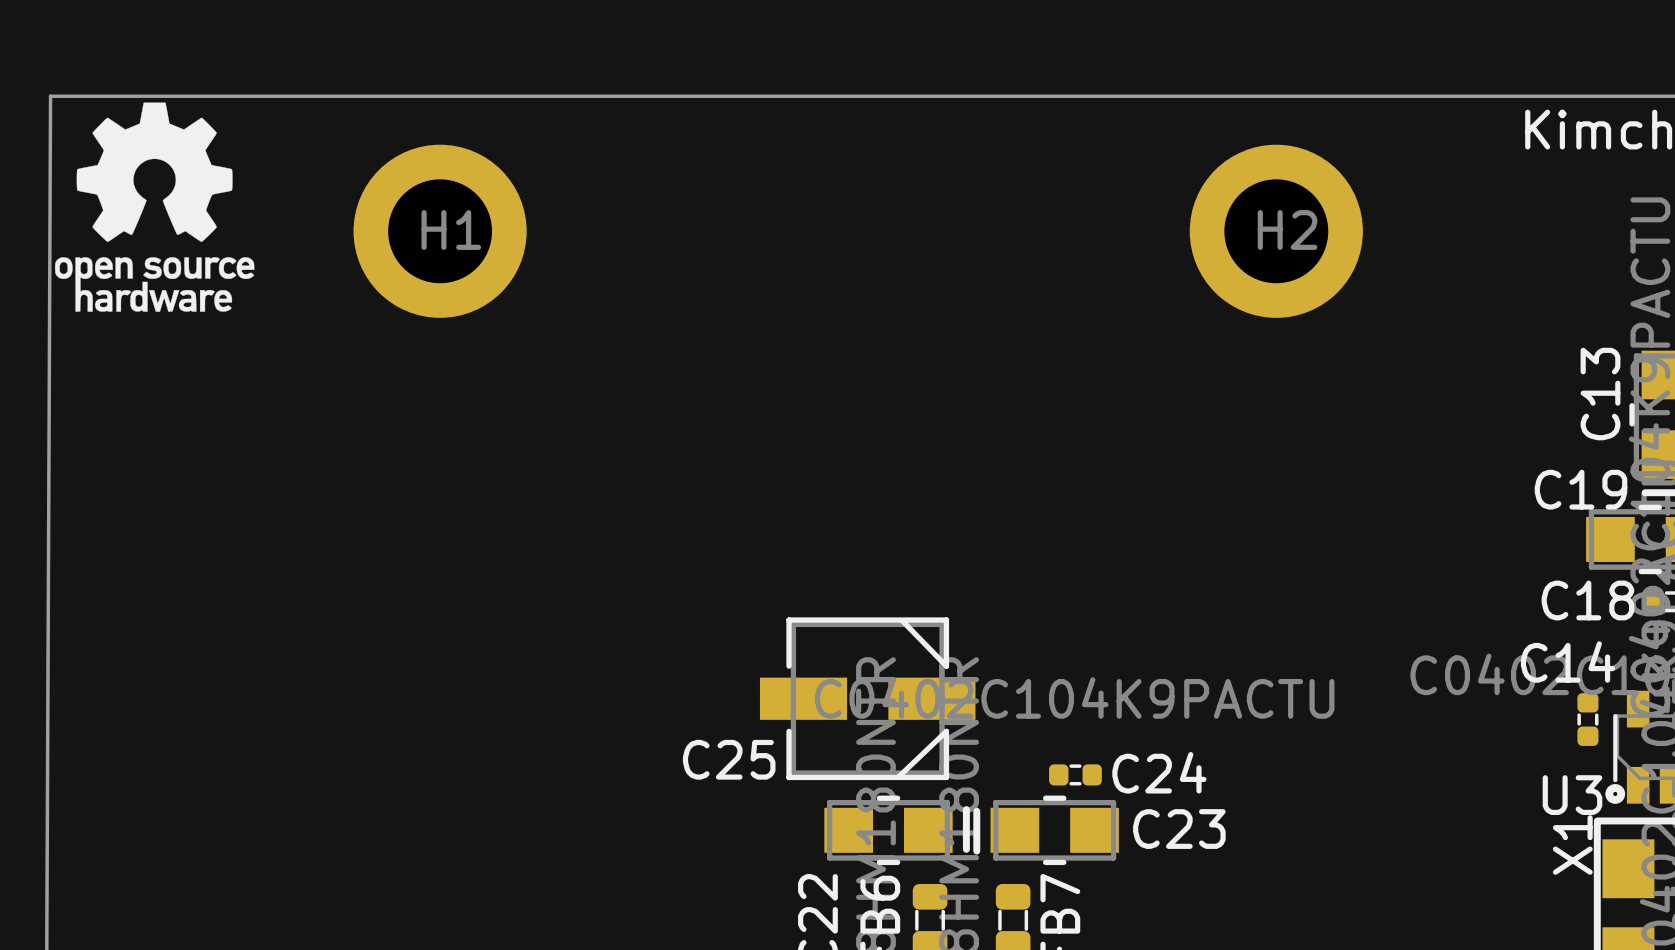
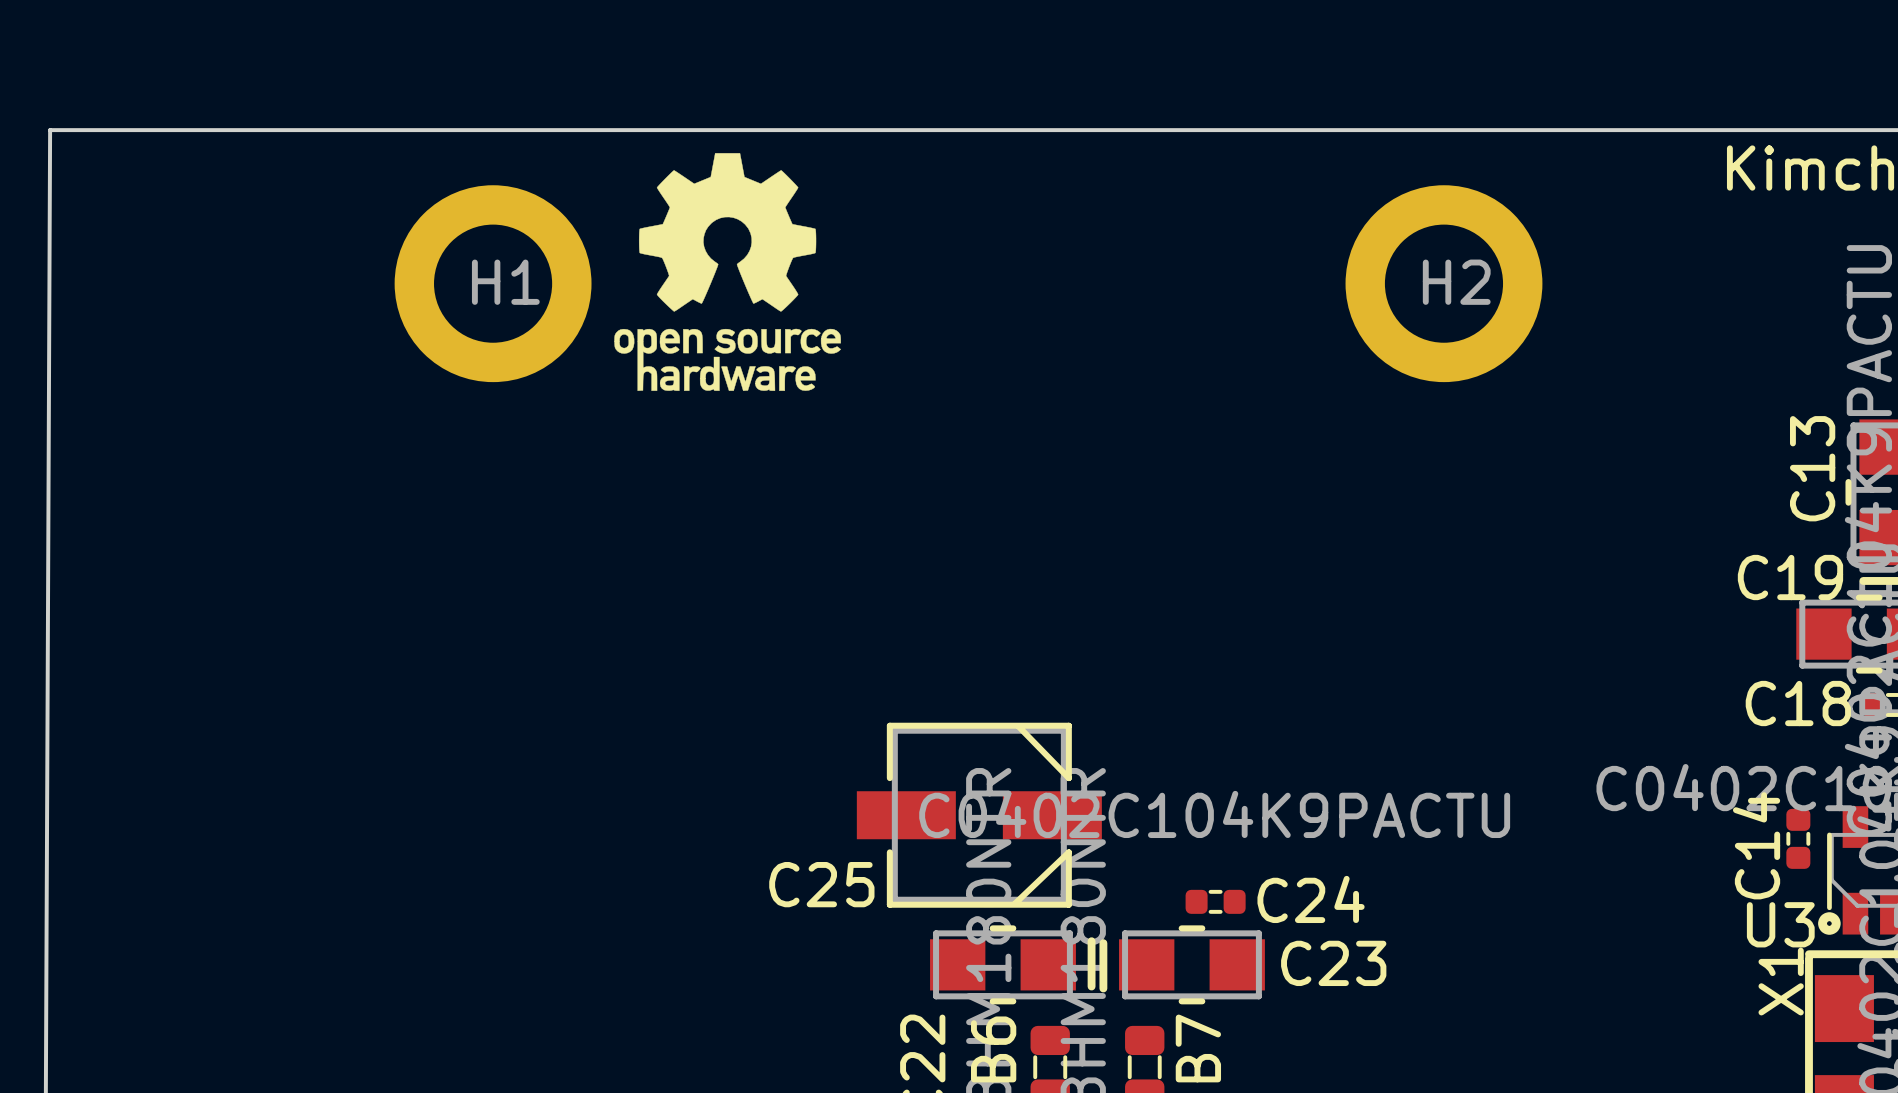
drawing position: (154, 207) -> (727, 272)
C14 name rotation: 0° (1567, 661) -> 90° counterclockwise (1756, 845)

